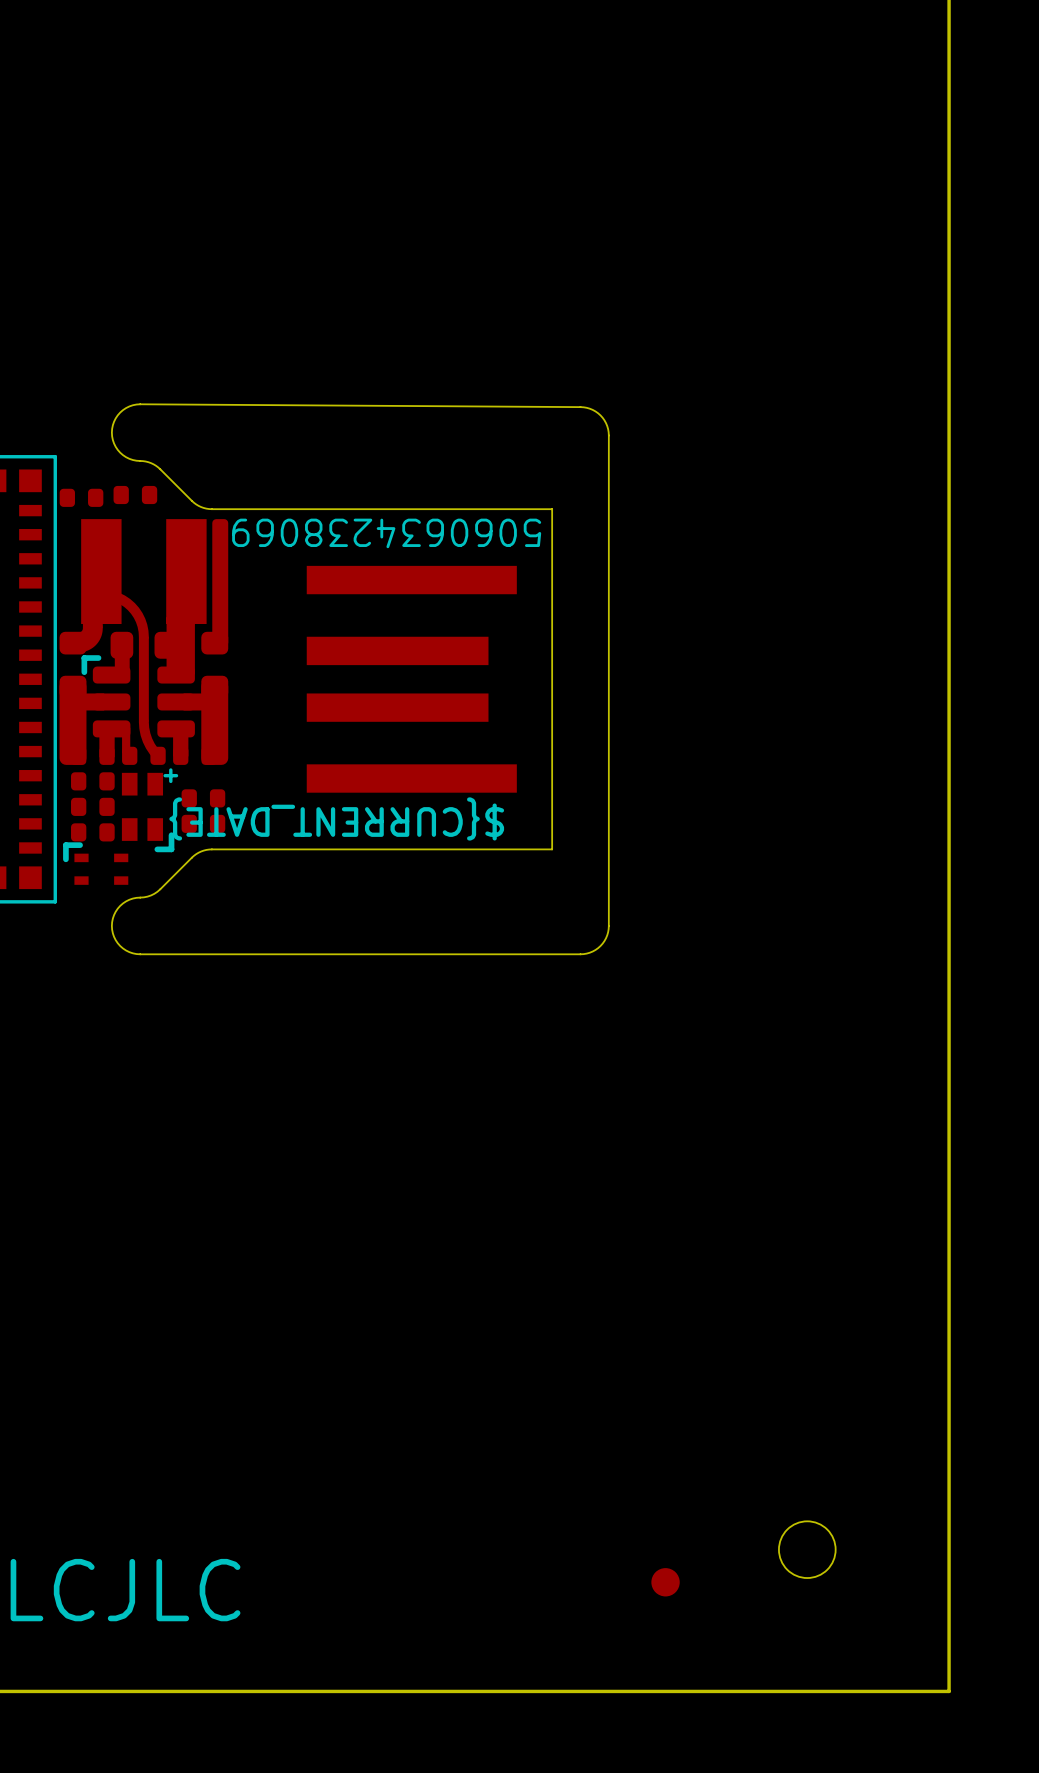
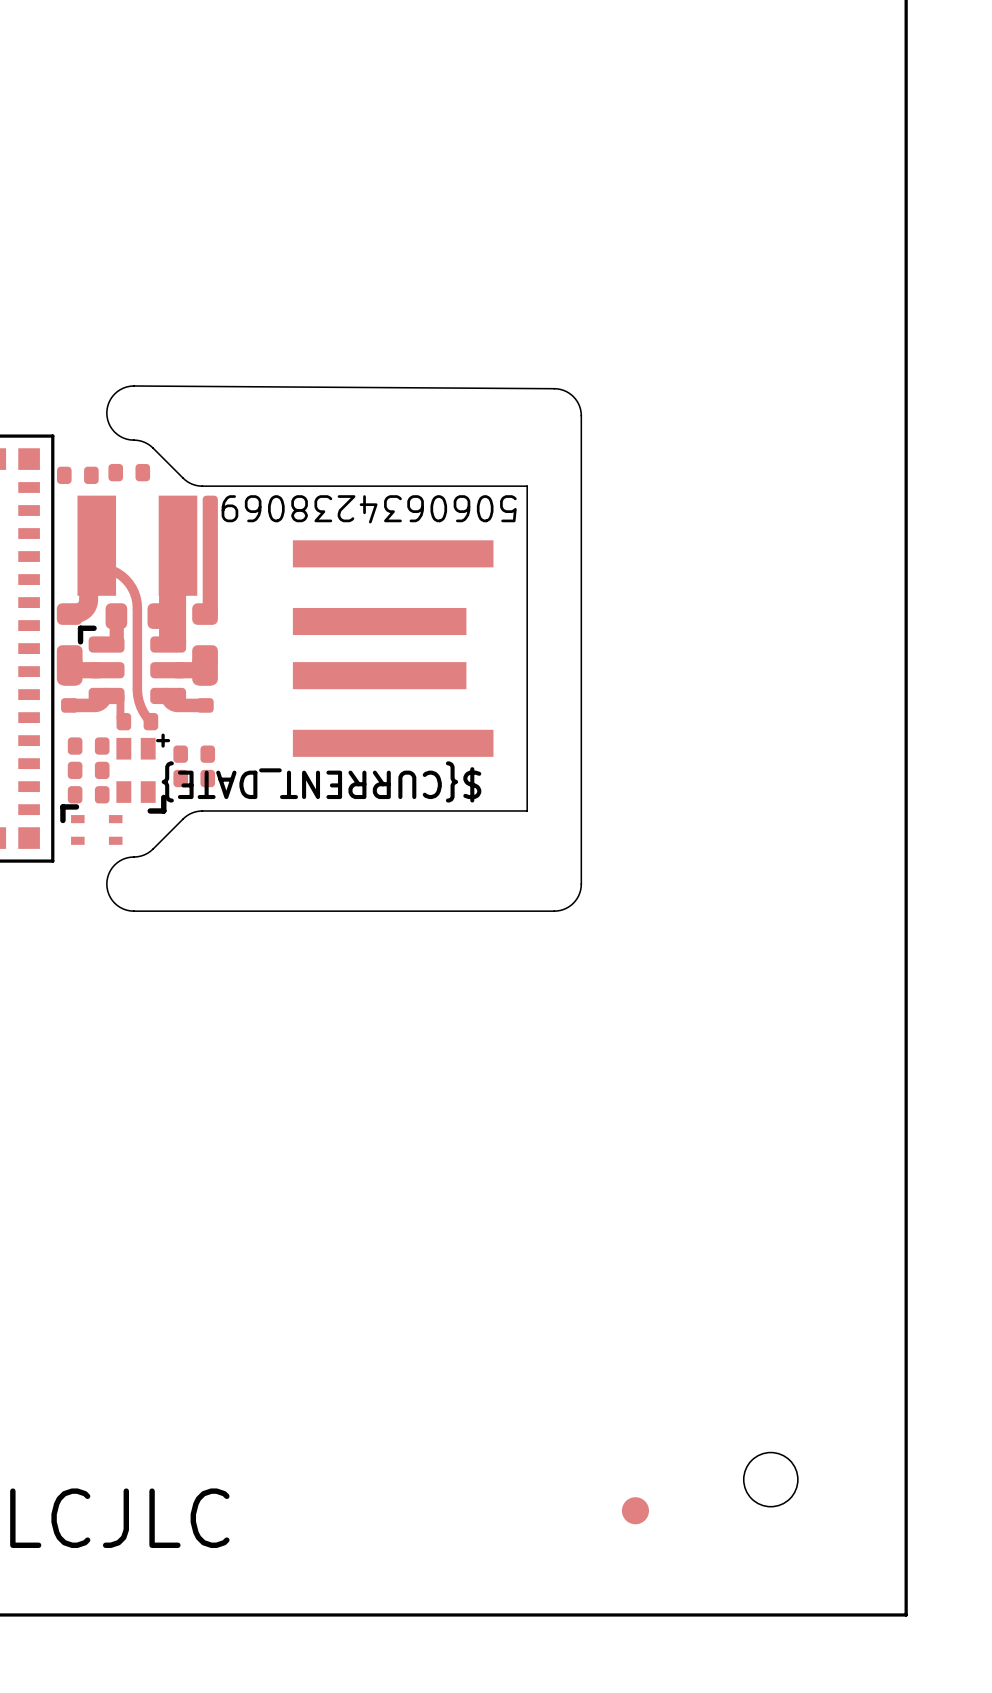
part footprint: [59, 519, 229, 765] -> [56, 495, 218, 731]
part: none -> (194, 754)
part: (203, 798) -> none
part: none -> (194, 778)
part: (203, 823) -> none

